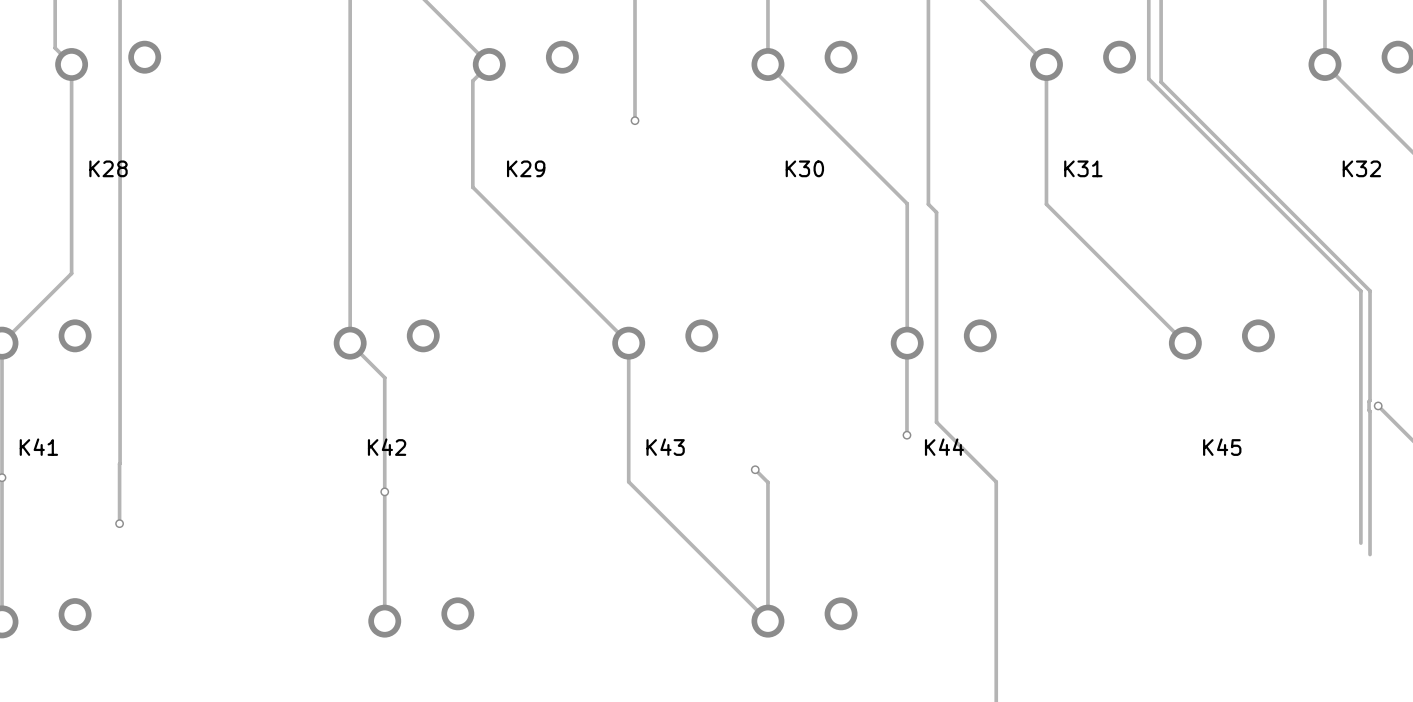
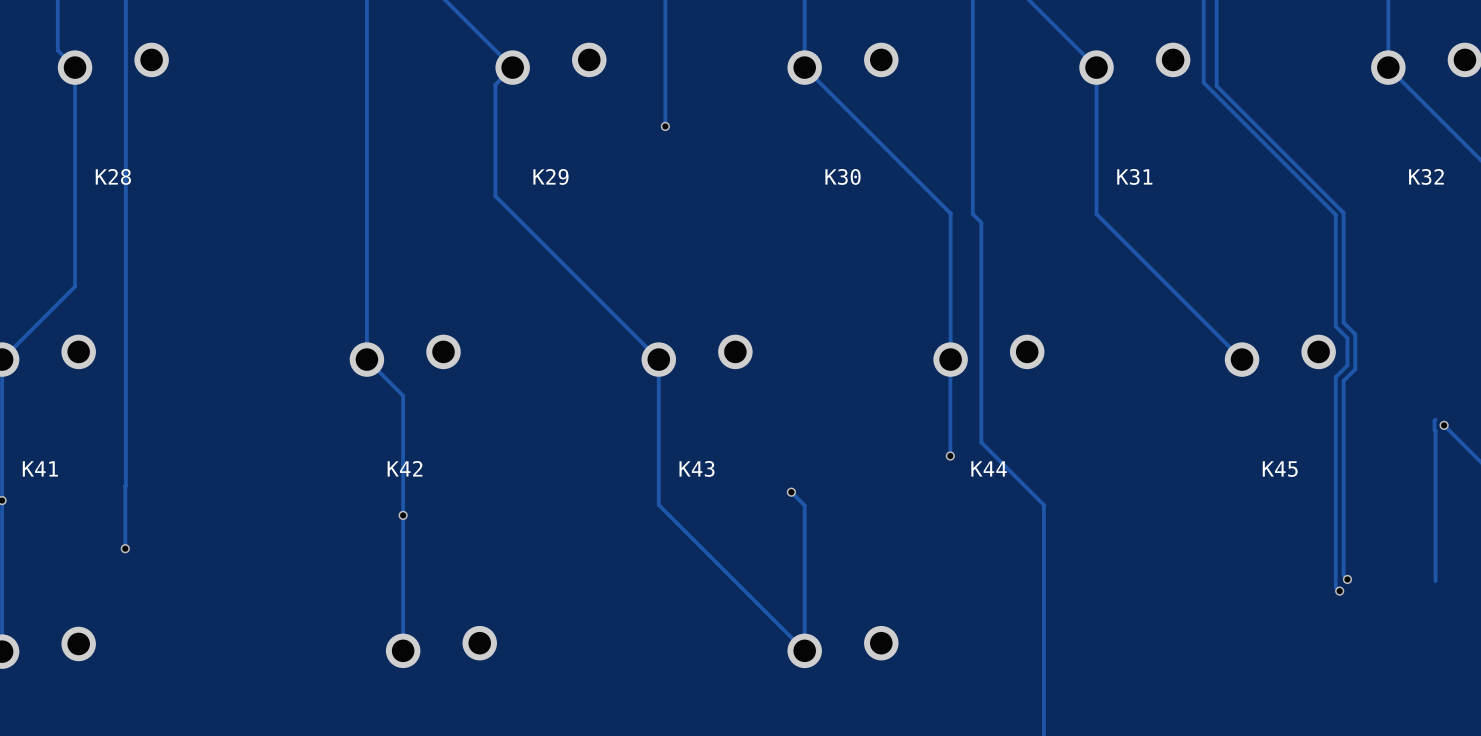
track: (1282, 203) (1370, 290) (1370, 400) -> (1343, 212) (1343, 322) (1355, 334) (1355, 369) (1343, 381) (1343, 575) (1347, 579)
track: (1274, 205) (1360, 291) (1360, 543) -> (1335, 214) (1335, 326) (1347, 338) (1347, 365) (1335, 377) (1335, 587) (1339, 591)
via: none -> (1347, 579)
via: none -> (1339, 591)

